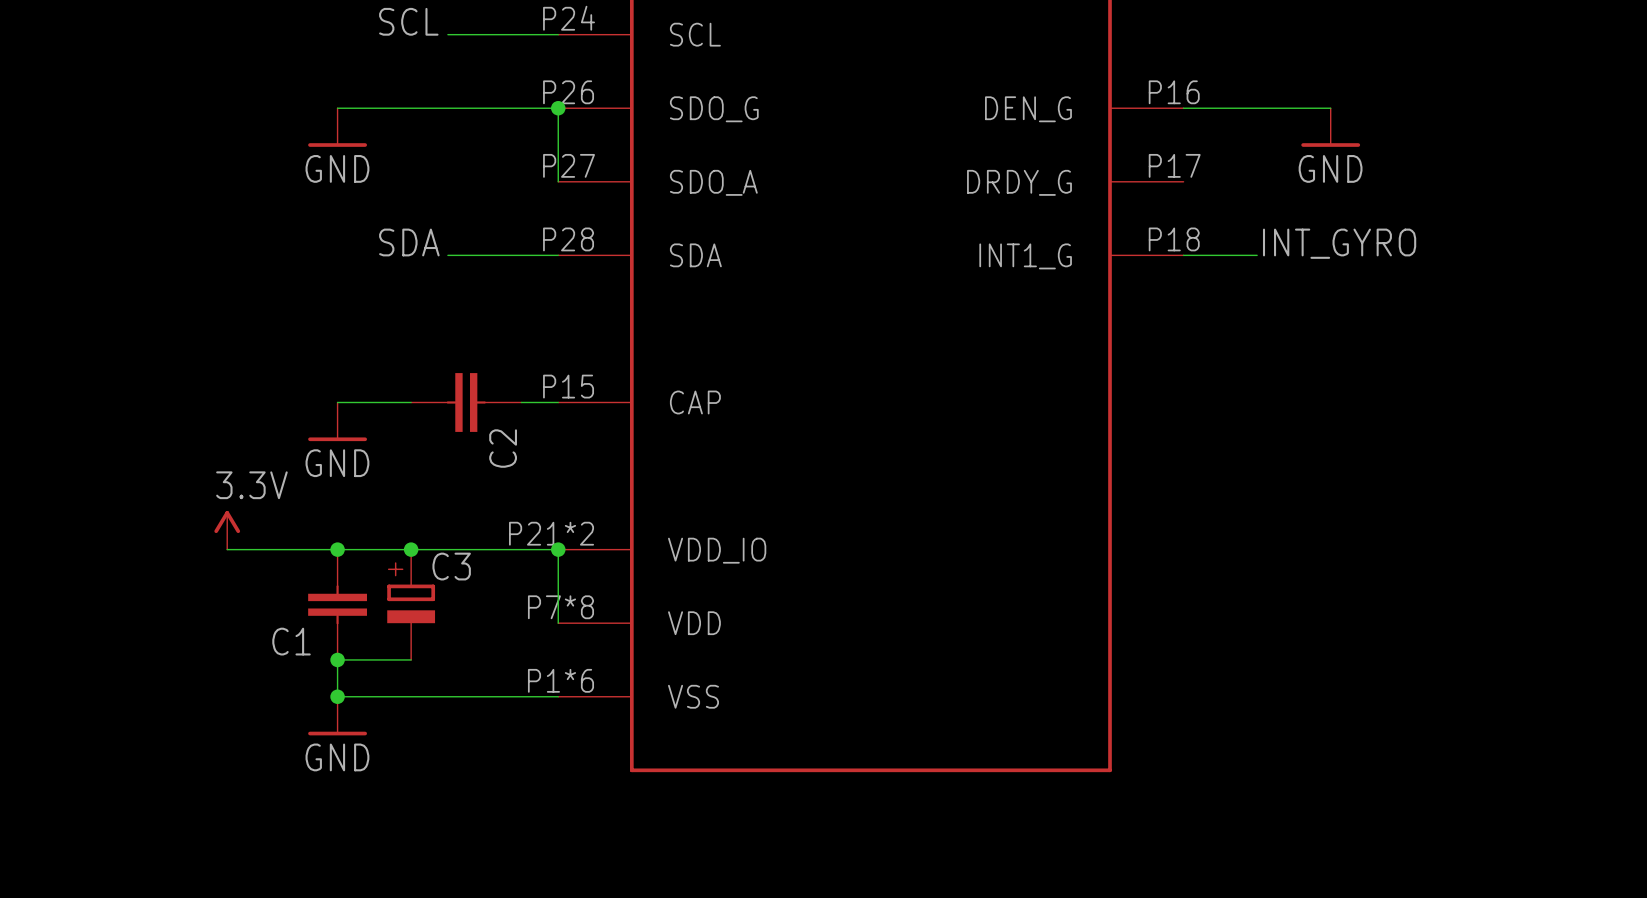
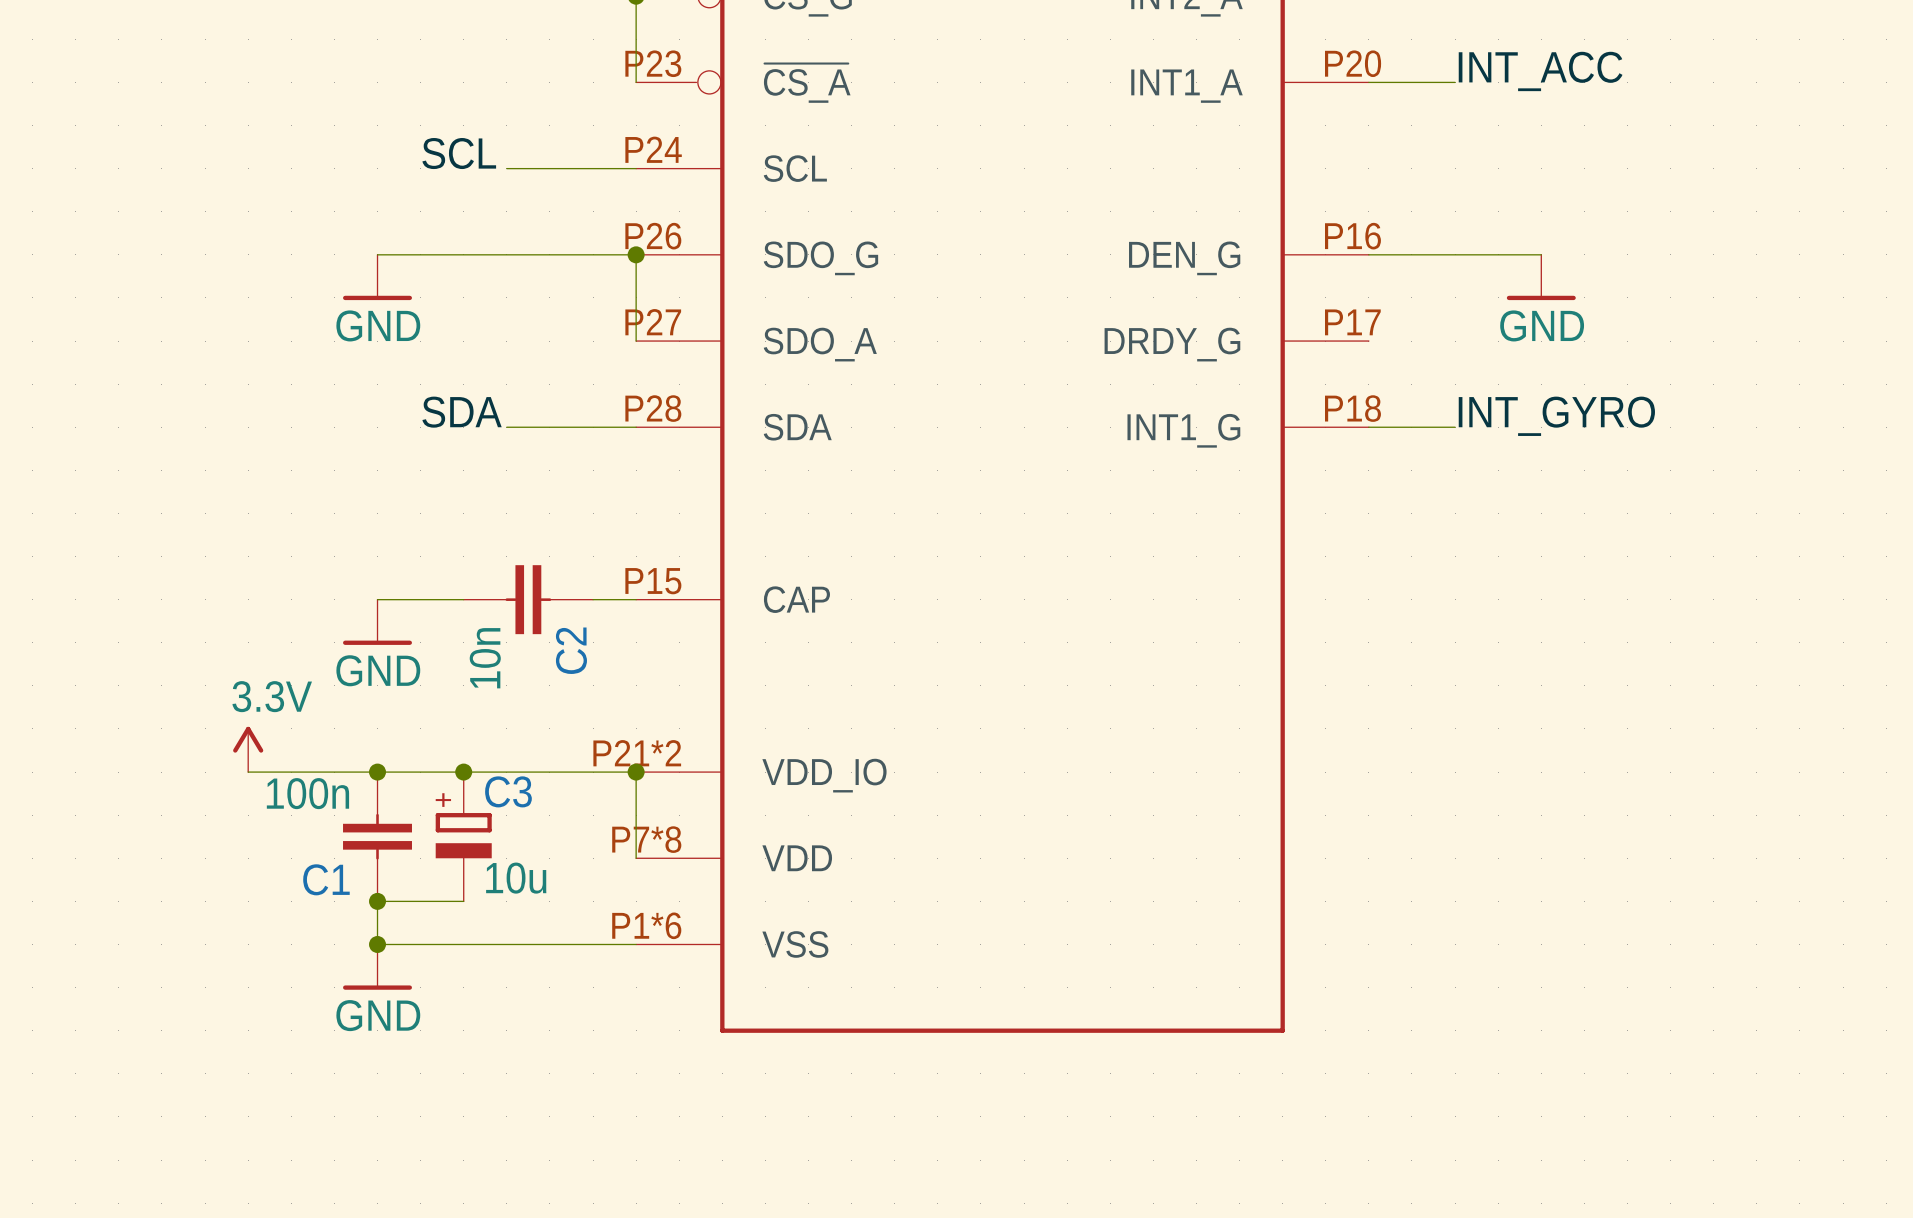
C2 value: none -> 10n (485, 658)
C1 value: none -> 100n (307, 793)
C3 value: none -> 10u (516, 878)

